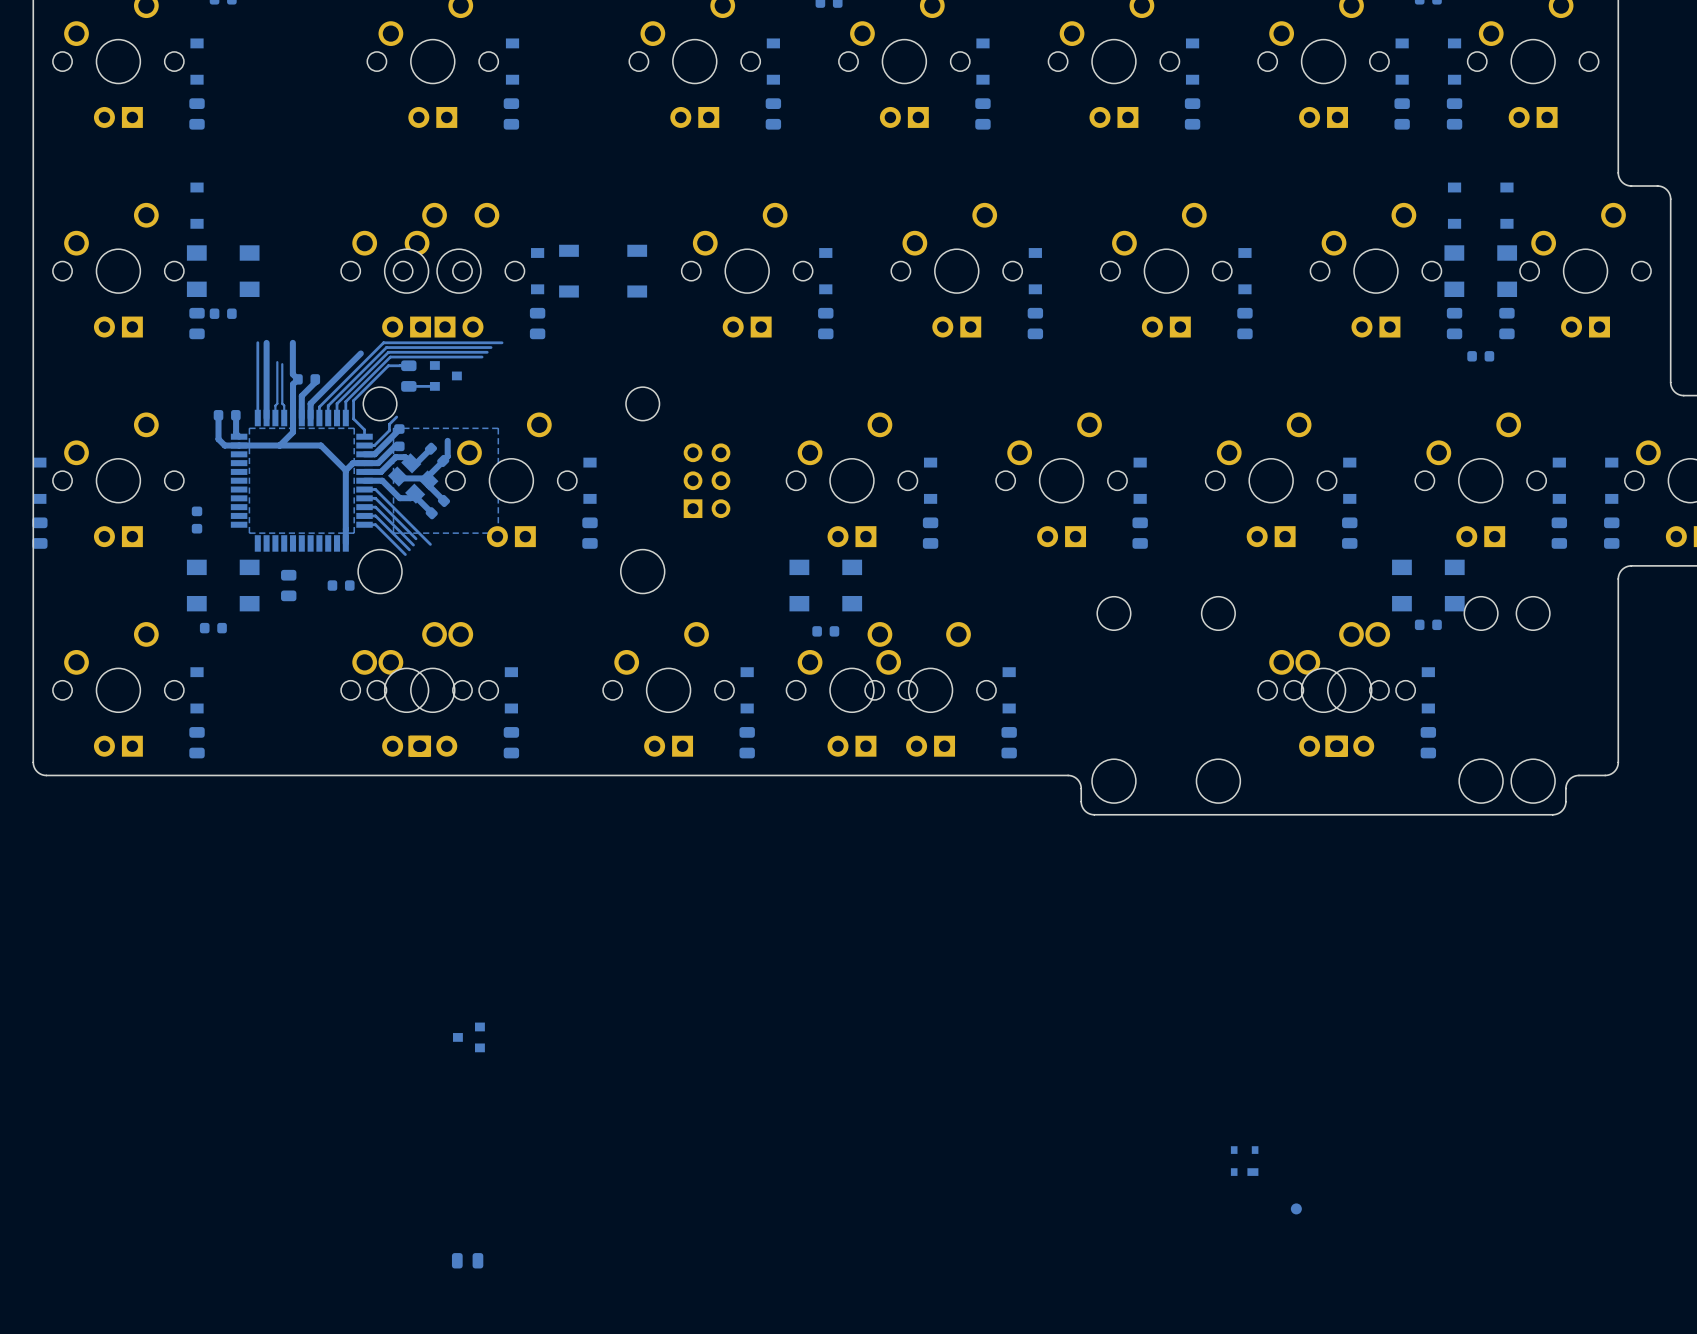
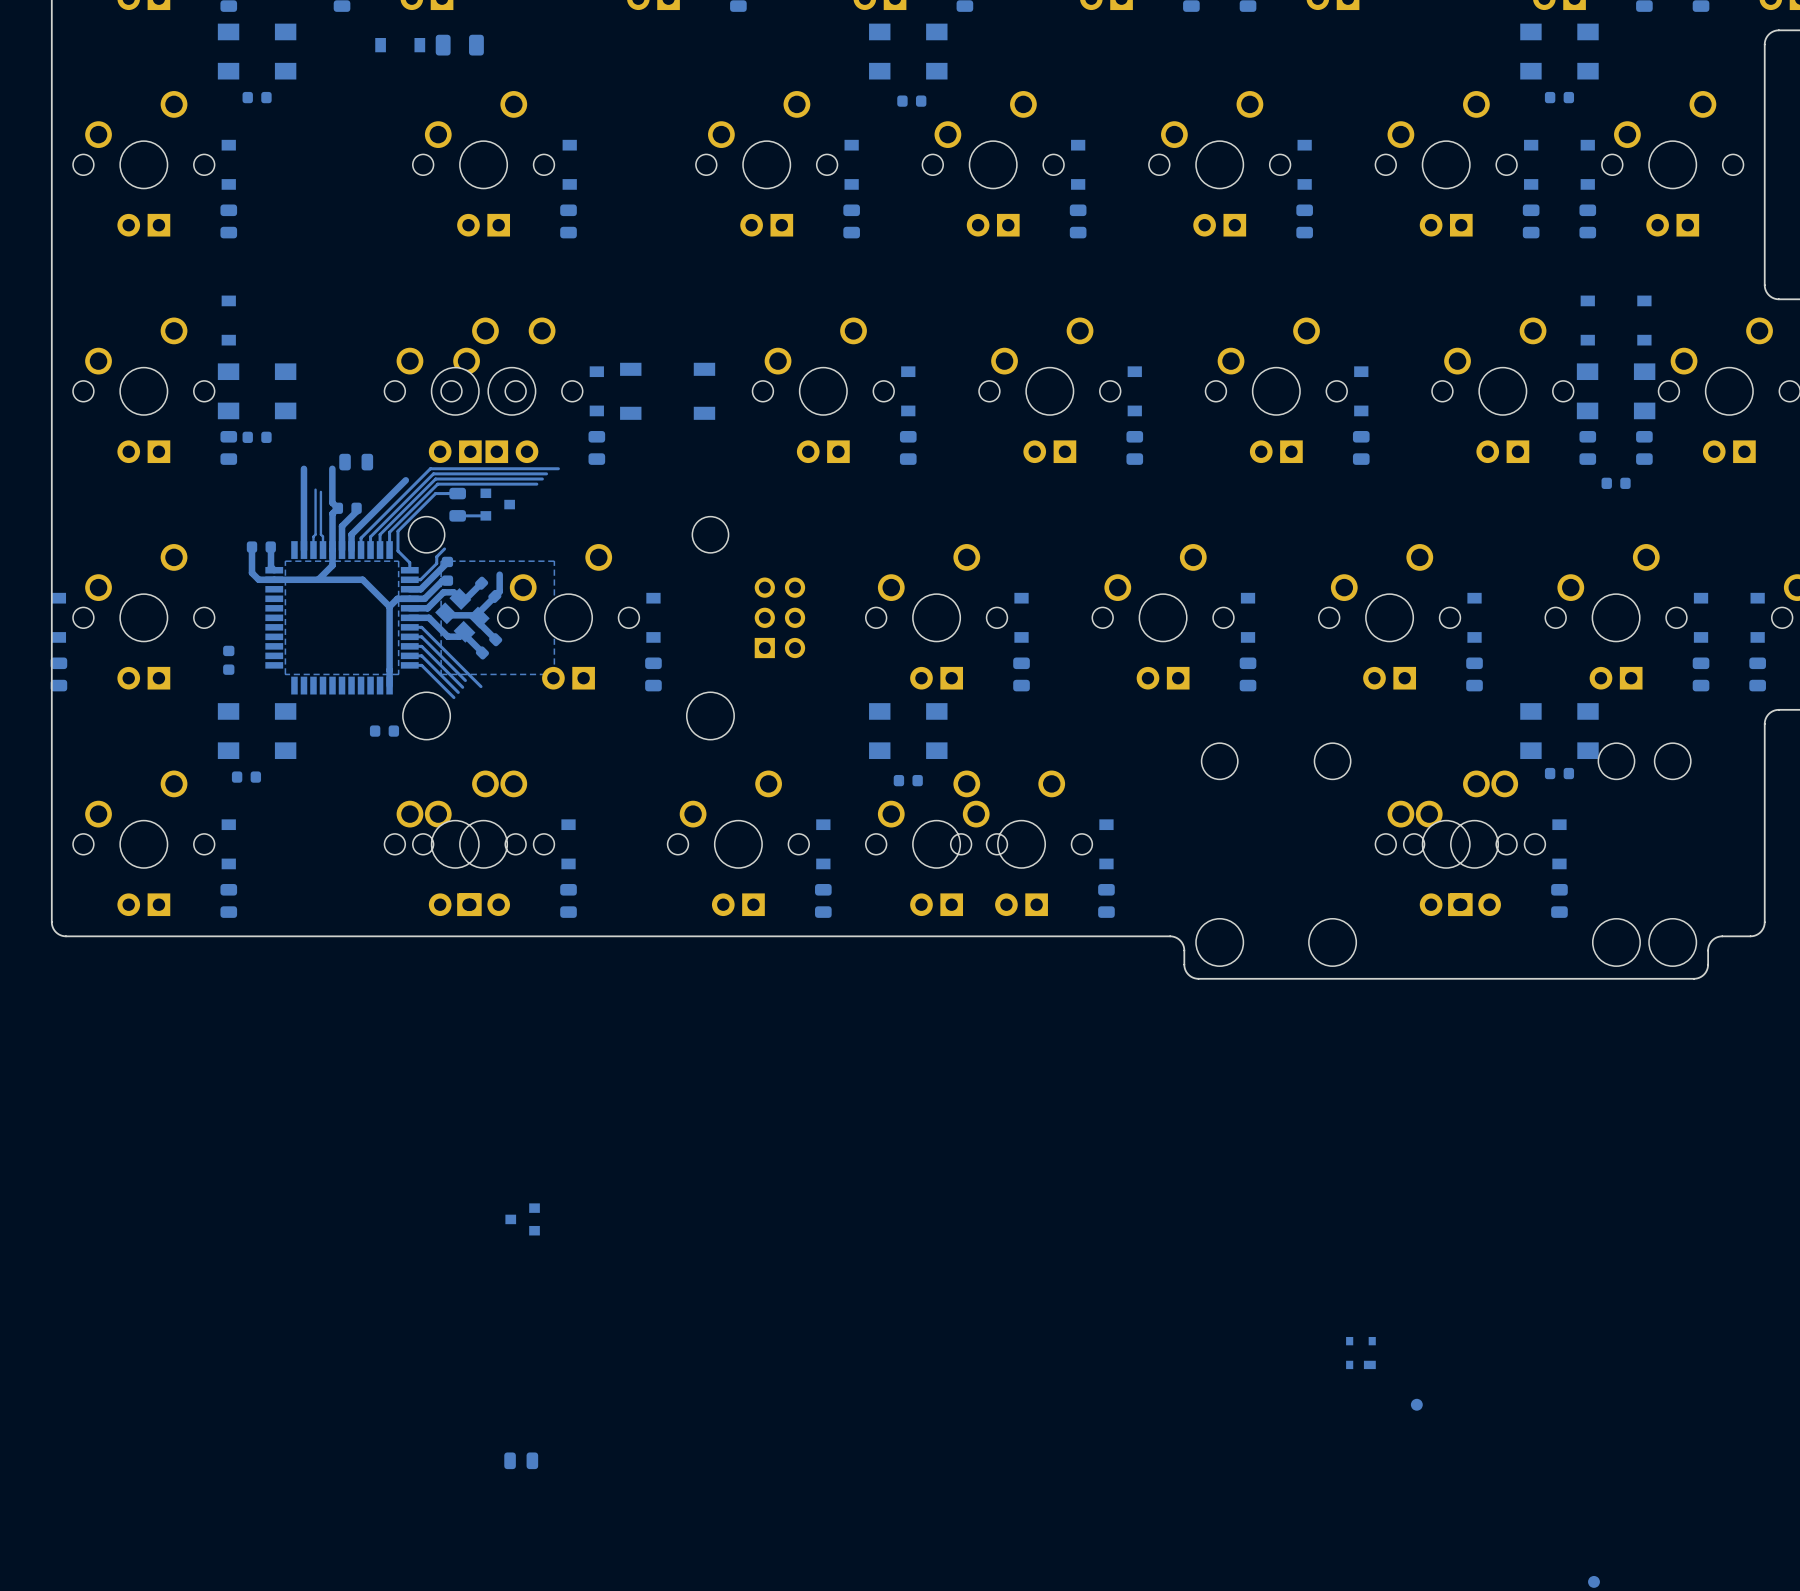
bottom track: (257, 342) (257, 418) -> none
part rotation: 0° (288, 585) -> 90° clockwise (356, 462)
part position: (288, 585) -> (356, 462)

